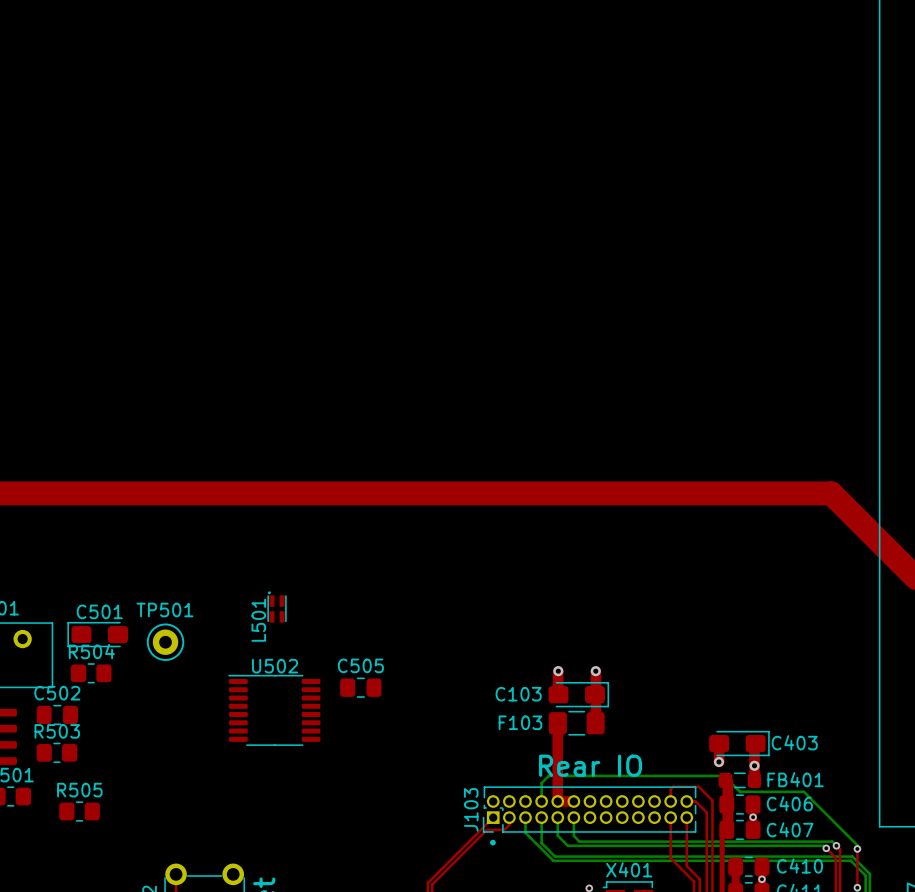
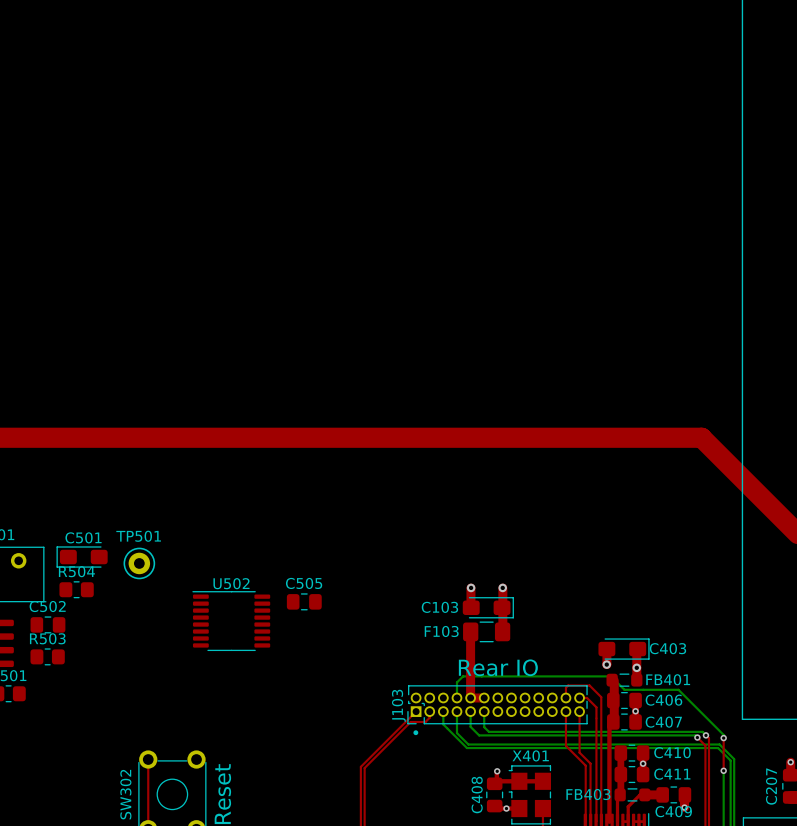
L501: (277, 607) -> none
R505: (79, 811) -> none

